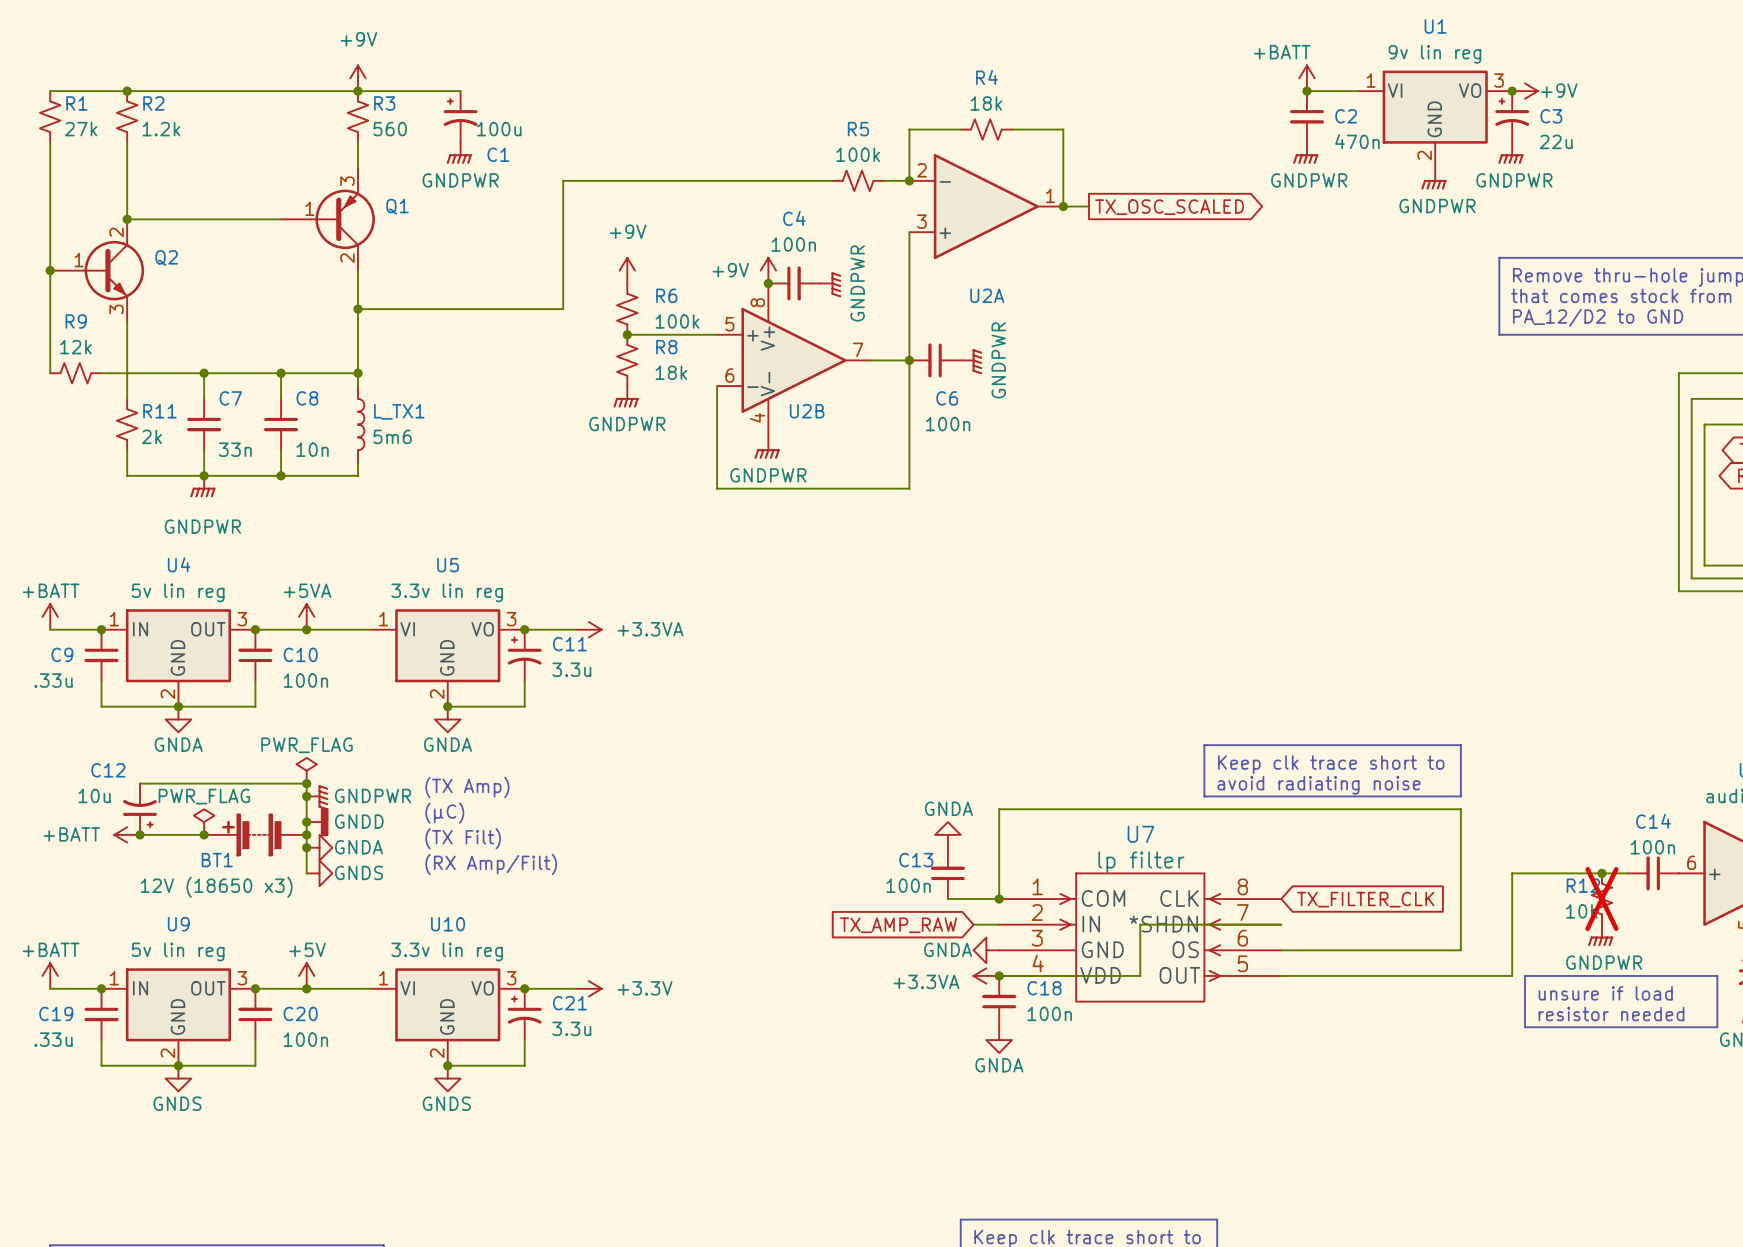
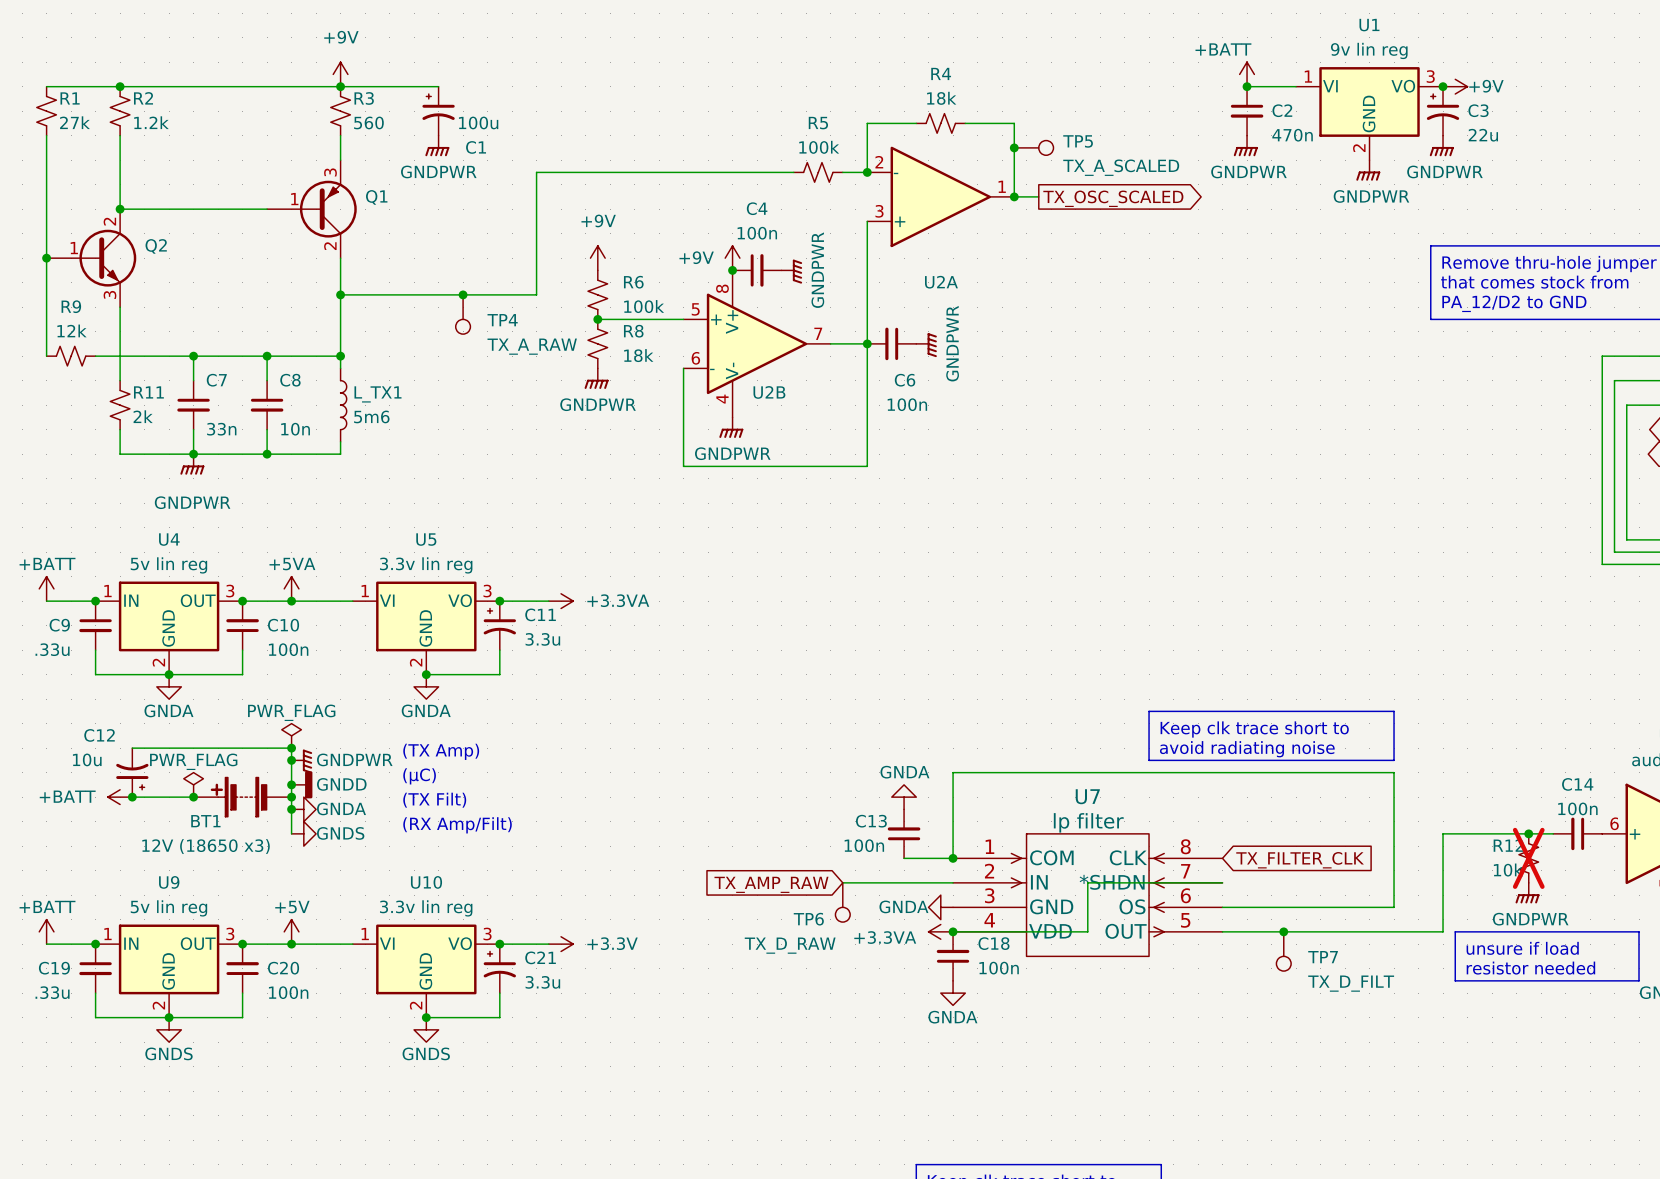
junction: none -> (1014, 147)
TP5: none -> TX_A_SCALED (1033, 147)
junction: none -> (463, 294)
TP4: none -> TX_A_RAW (463, 314)
wire: none -> (842, 882) (928, 882)
global label position: TX_AMP_RAW (898, 925) -> TX_AMP_RAW (771, 884)
TP6: none -> TX_D_RAW (842, 902)
junction: none -> (1283, 931)
TP7: none -> TX_D_FILT (1283, 951)

